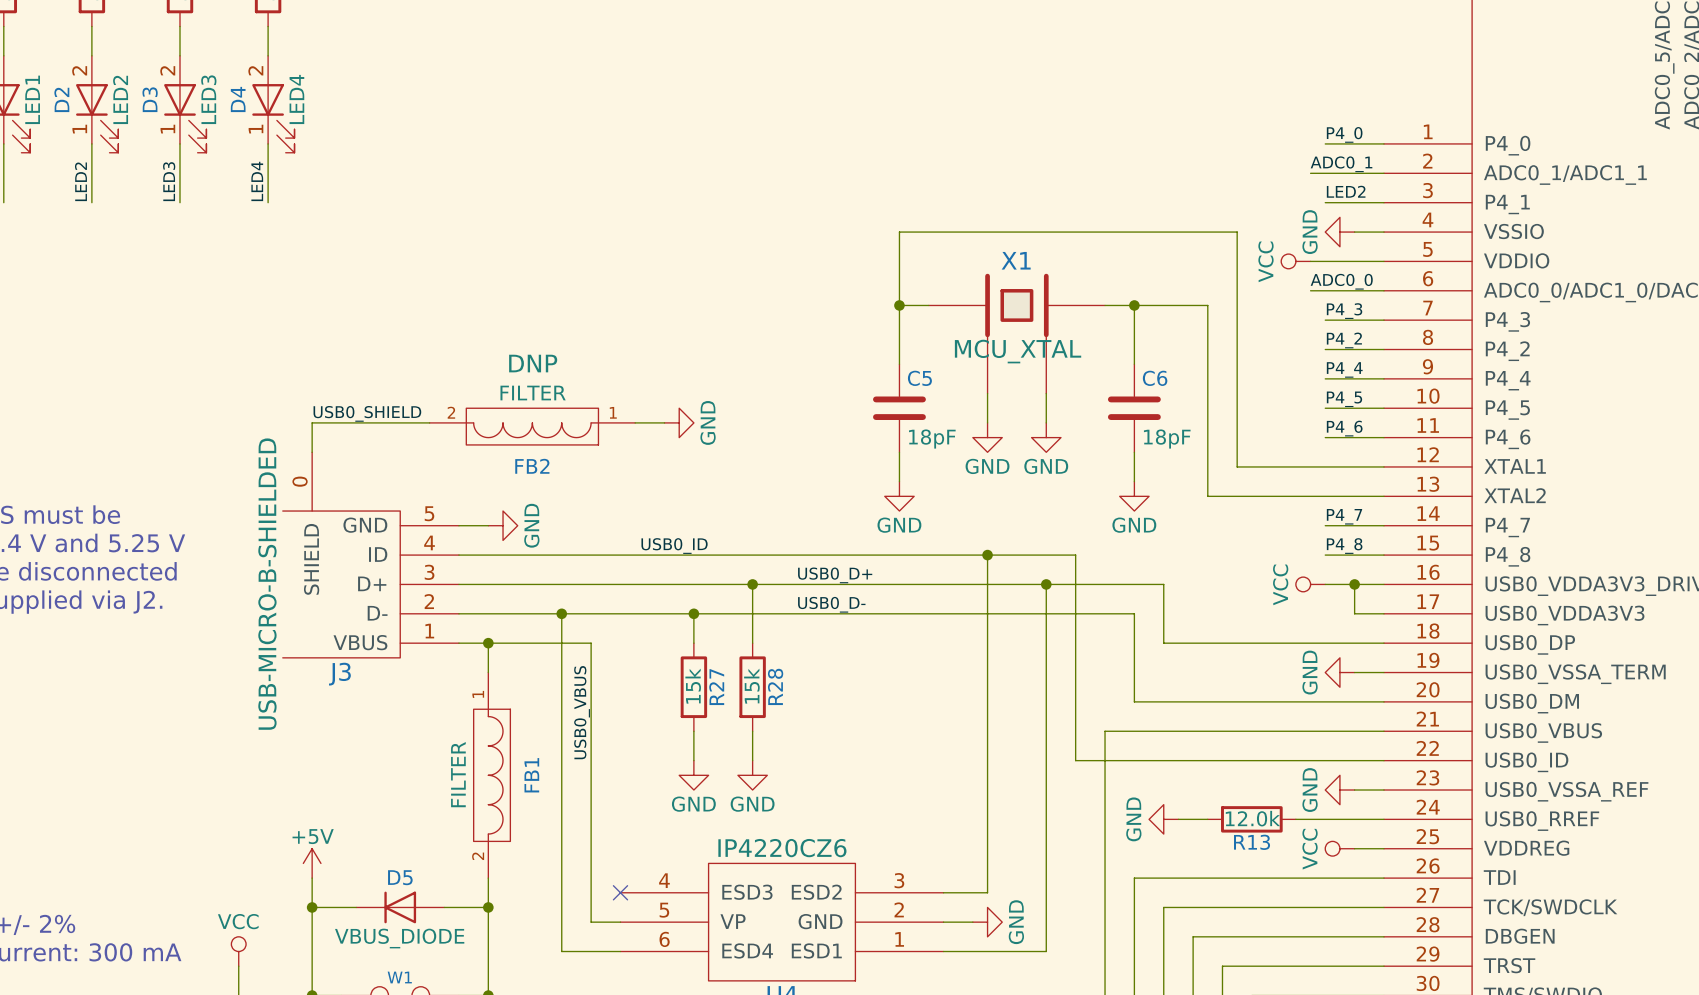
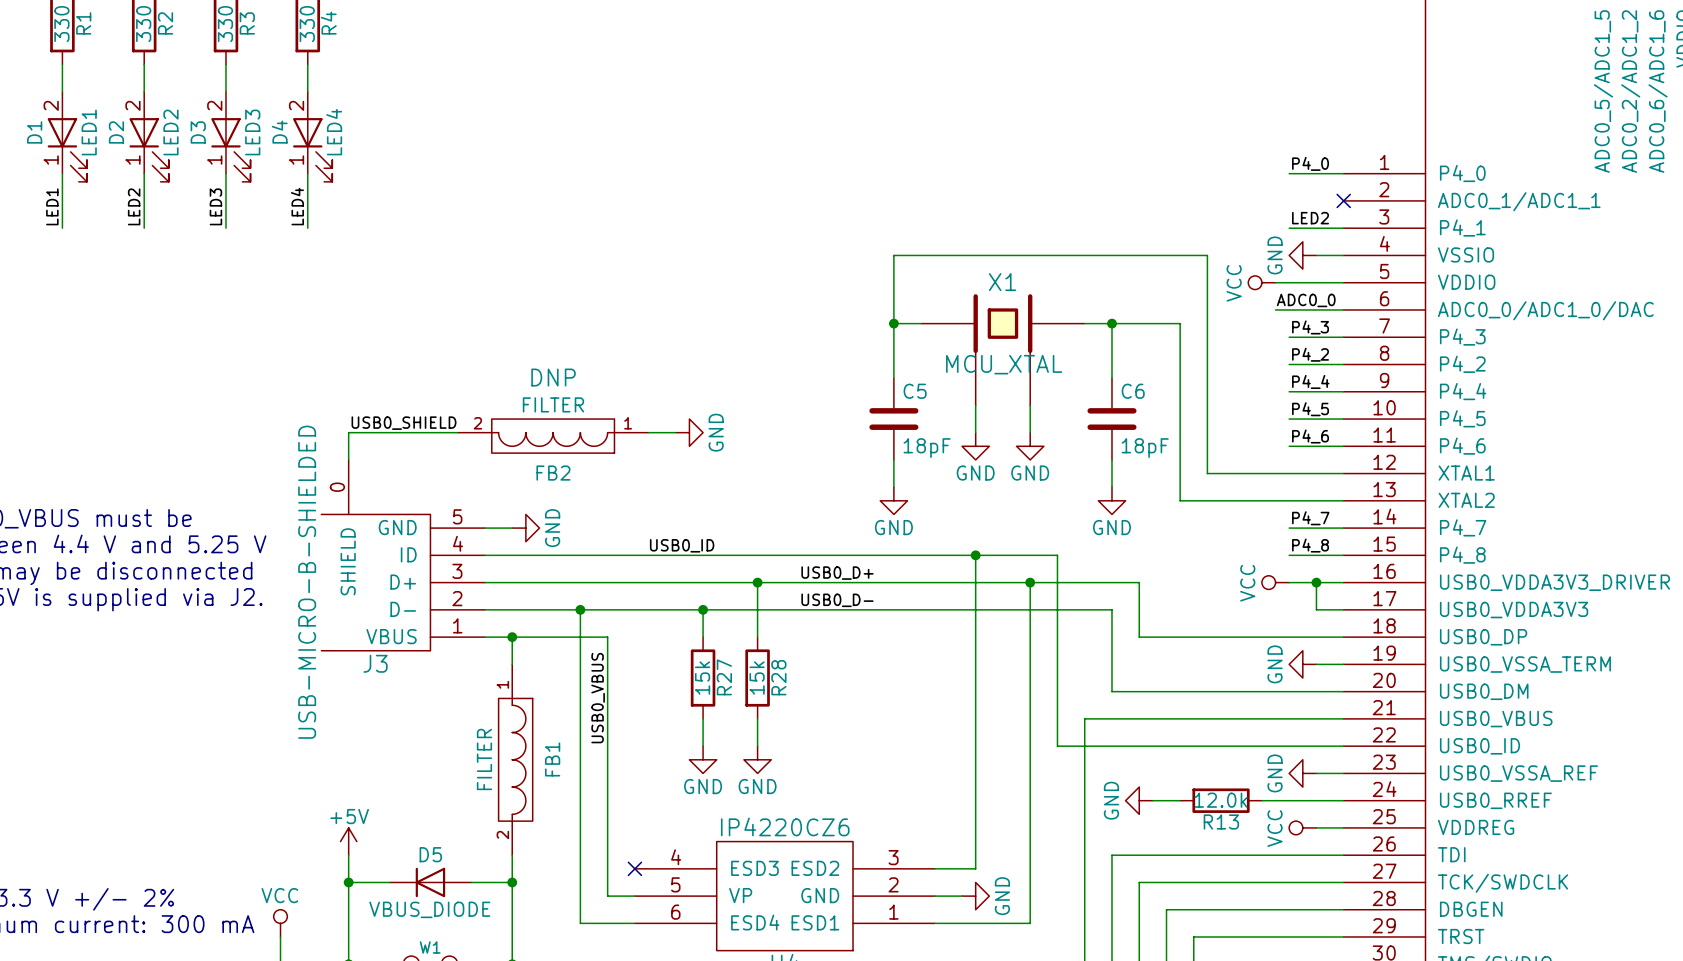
label: ADC0_1 (1341, 164) -> none
wire: (1310, 173) (1383, 173) -> none
no-connect mark: none -> (1343, 200)

